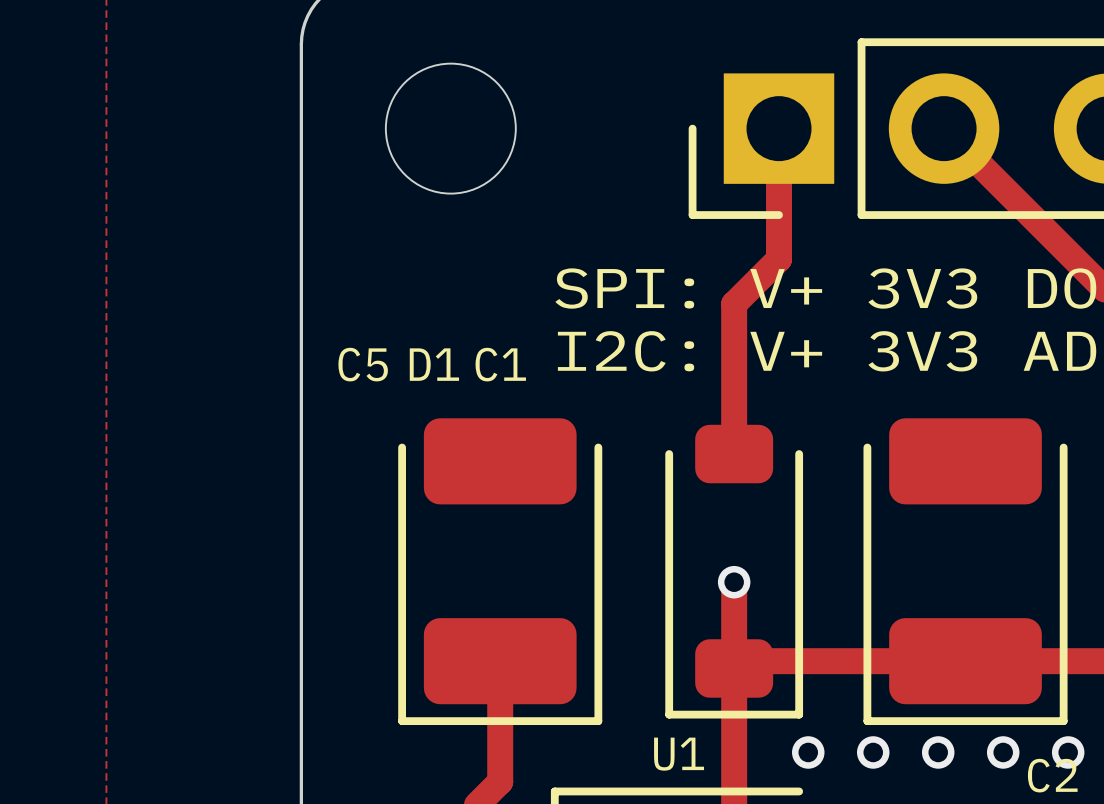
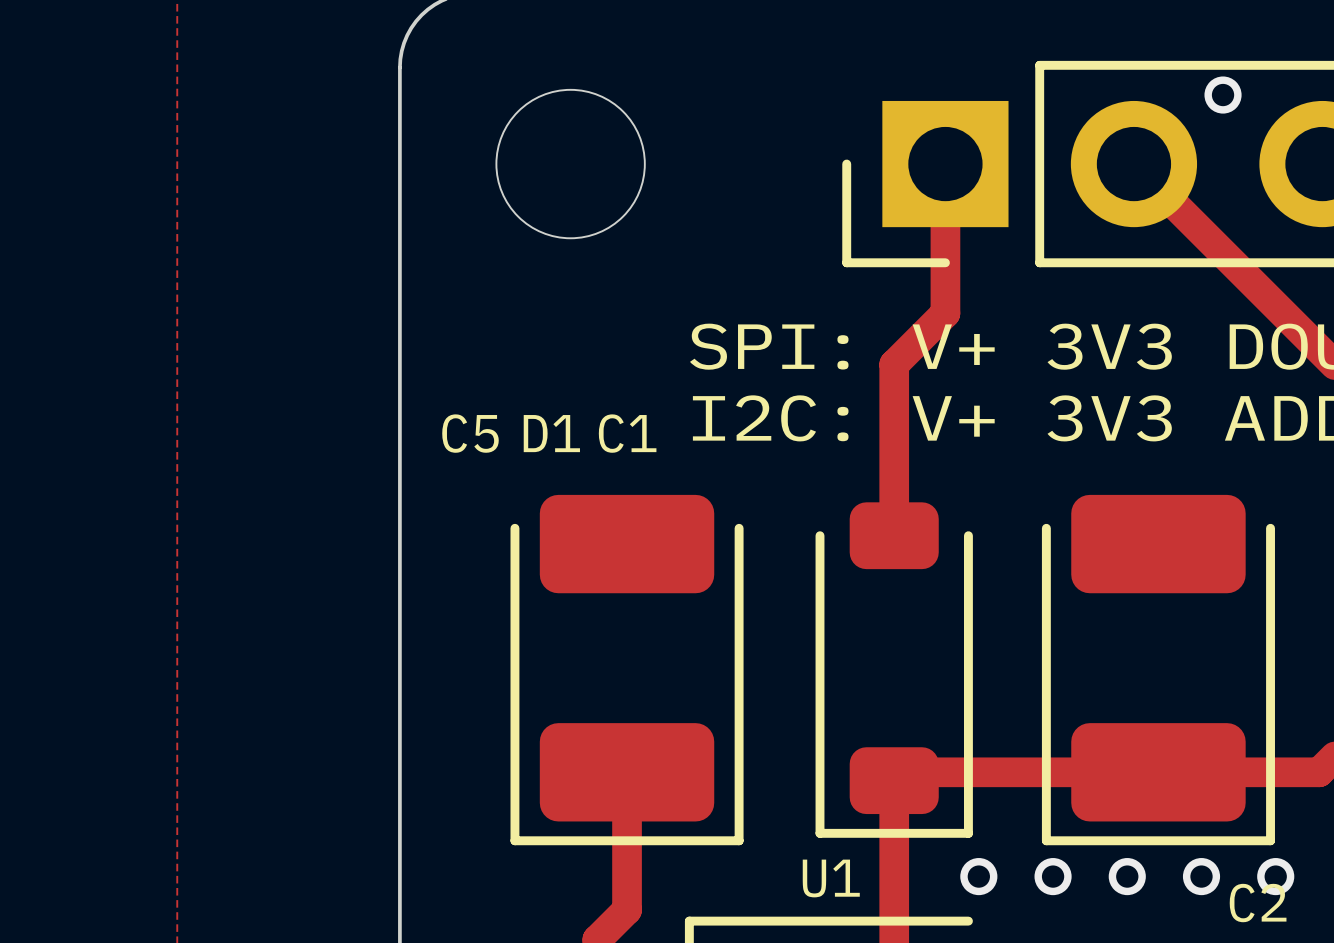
via: none -> (1223, 95)
track: (734, 582) (734, 668) -> none
via: (734, 582) -> none

